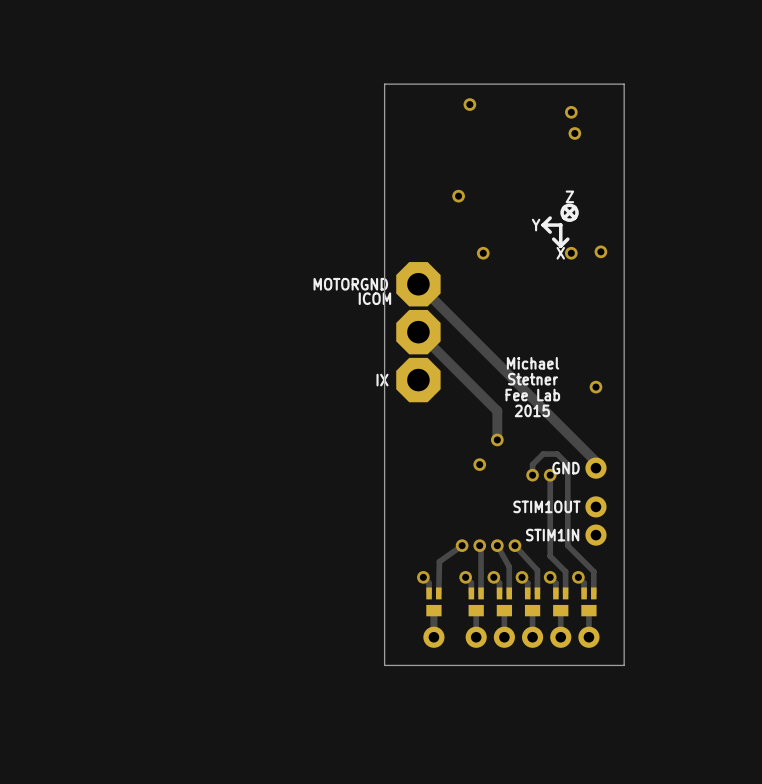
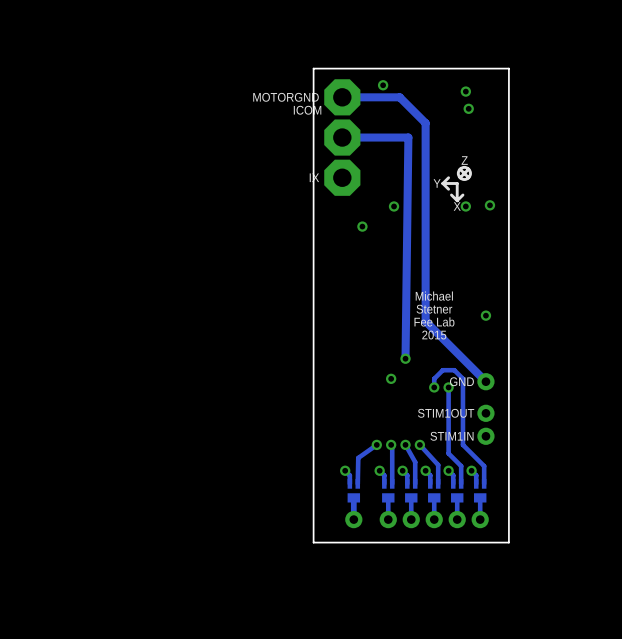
via position: (458, 196) -> (362, 226)
track: (418, 284) (595, 461) (595, 468) -> (342, 97) (399, 97) (425, 123) (425, 321) (485, 381)
MOTORGND position: (418, 284) -> (342, 97)
track: (418, 332) (497, 411) (497, 439) -> (342, 137) (408, 137) (405, 358)
ICOM position: (418, 332) -> (342, 137)
IX position: (418, 380) -> (342, 177)

